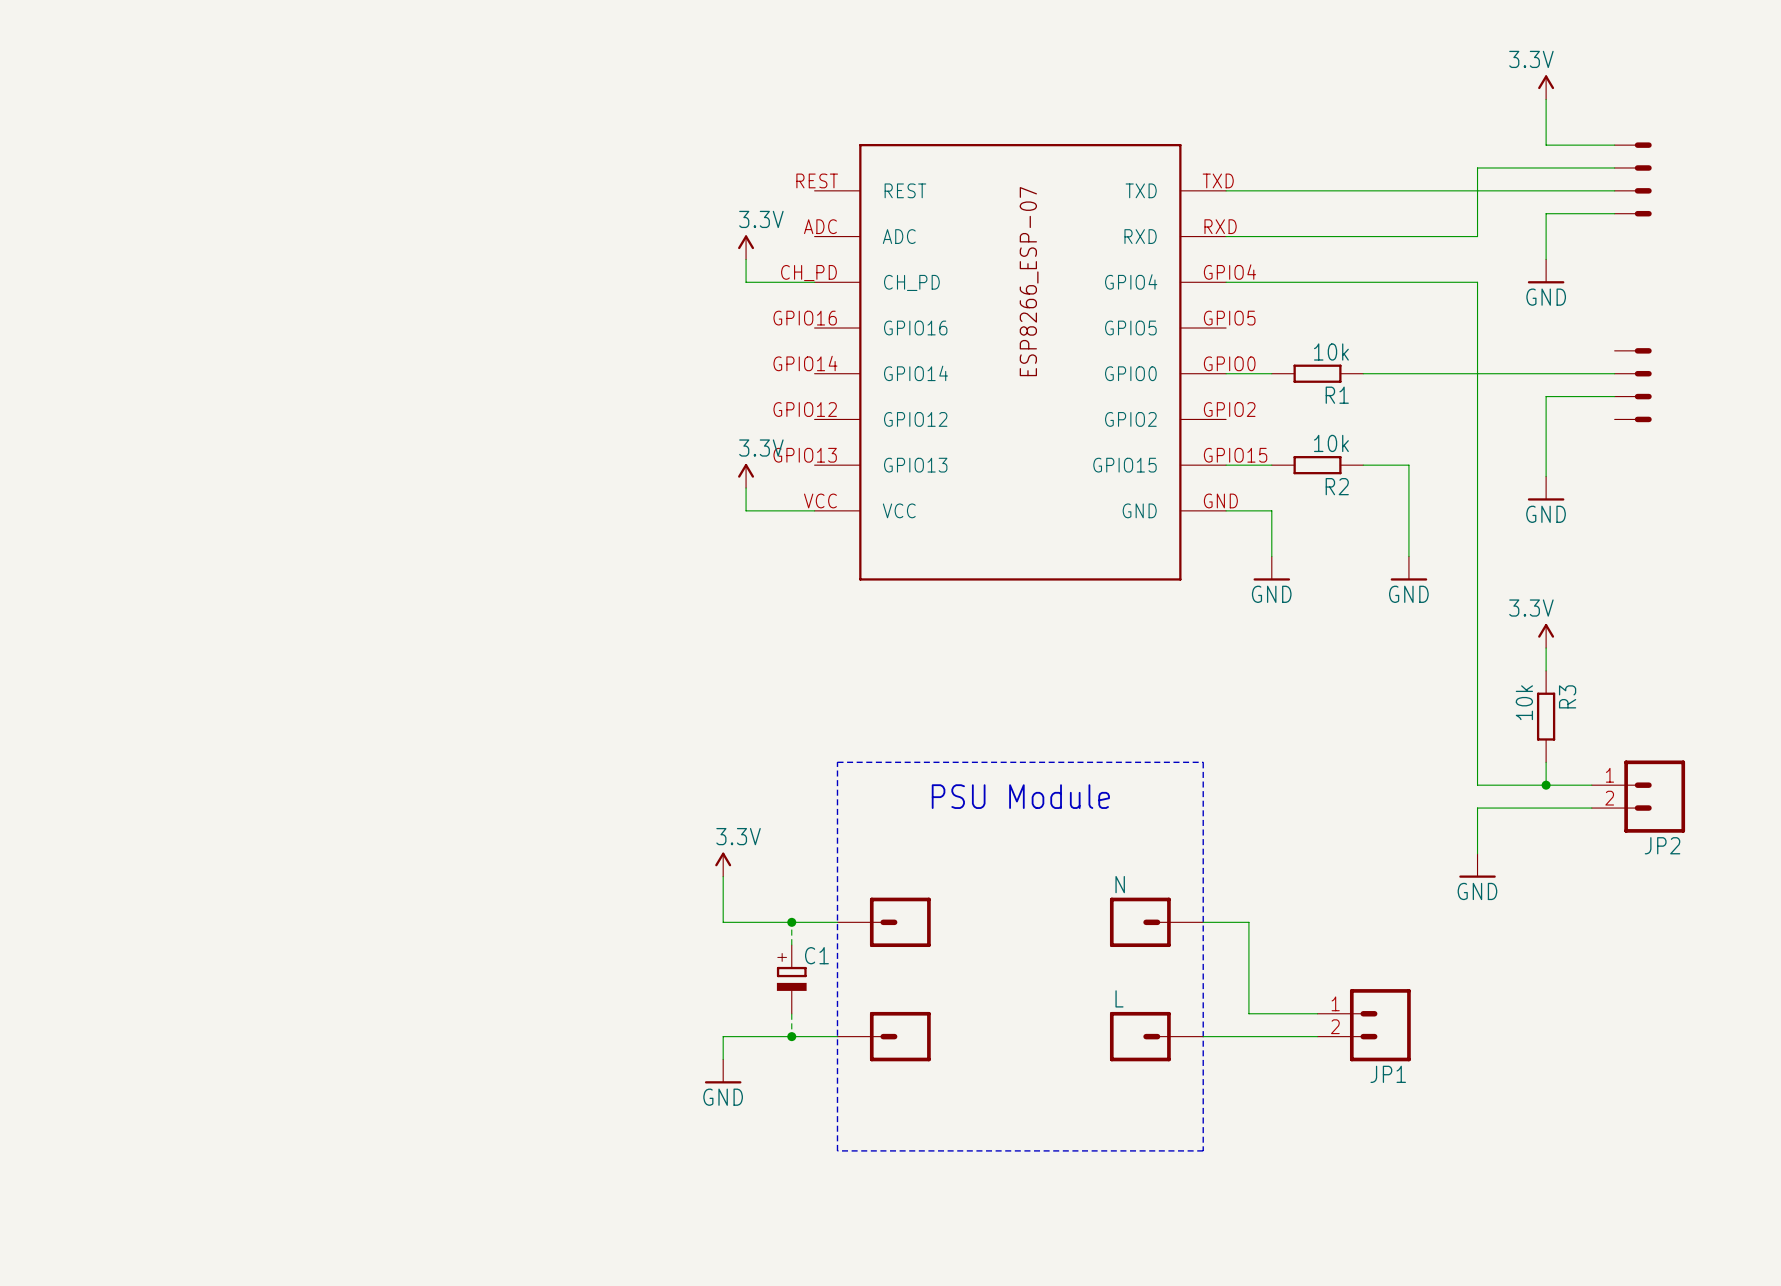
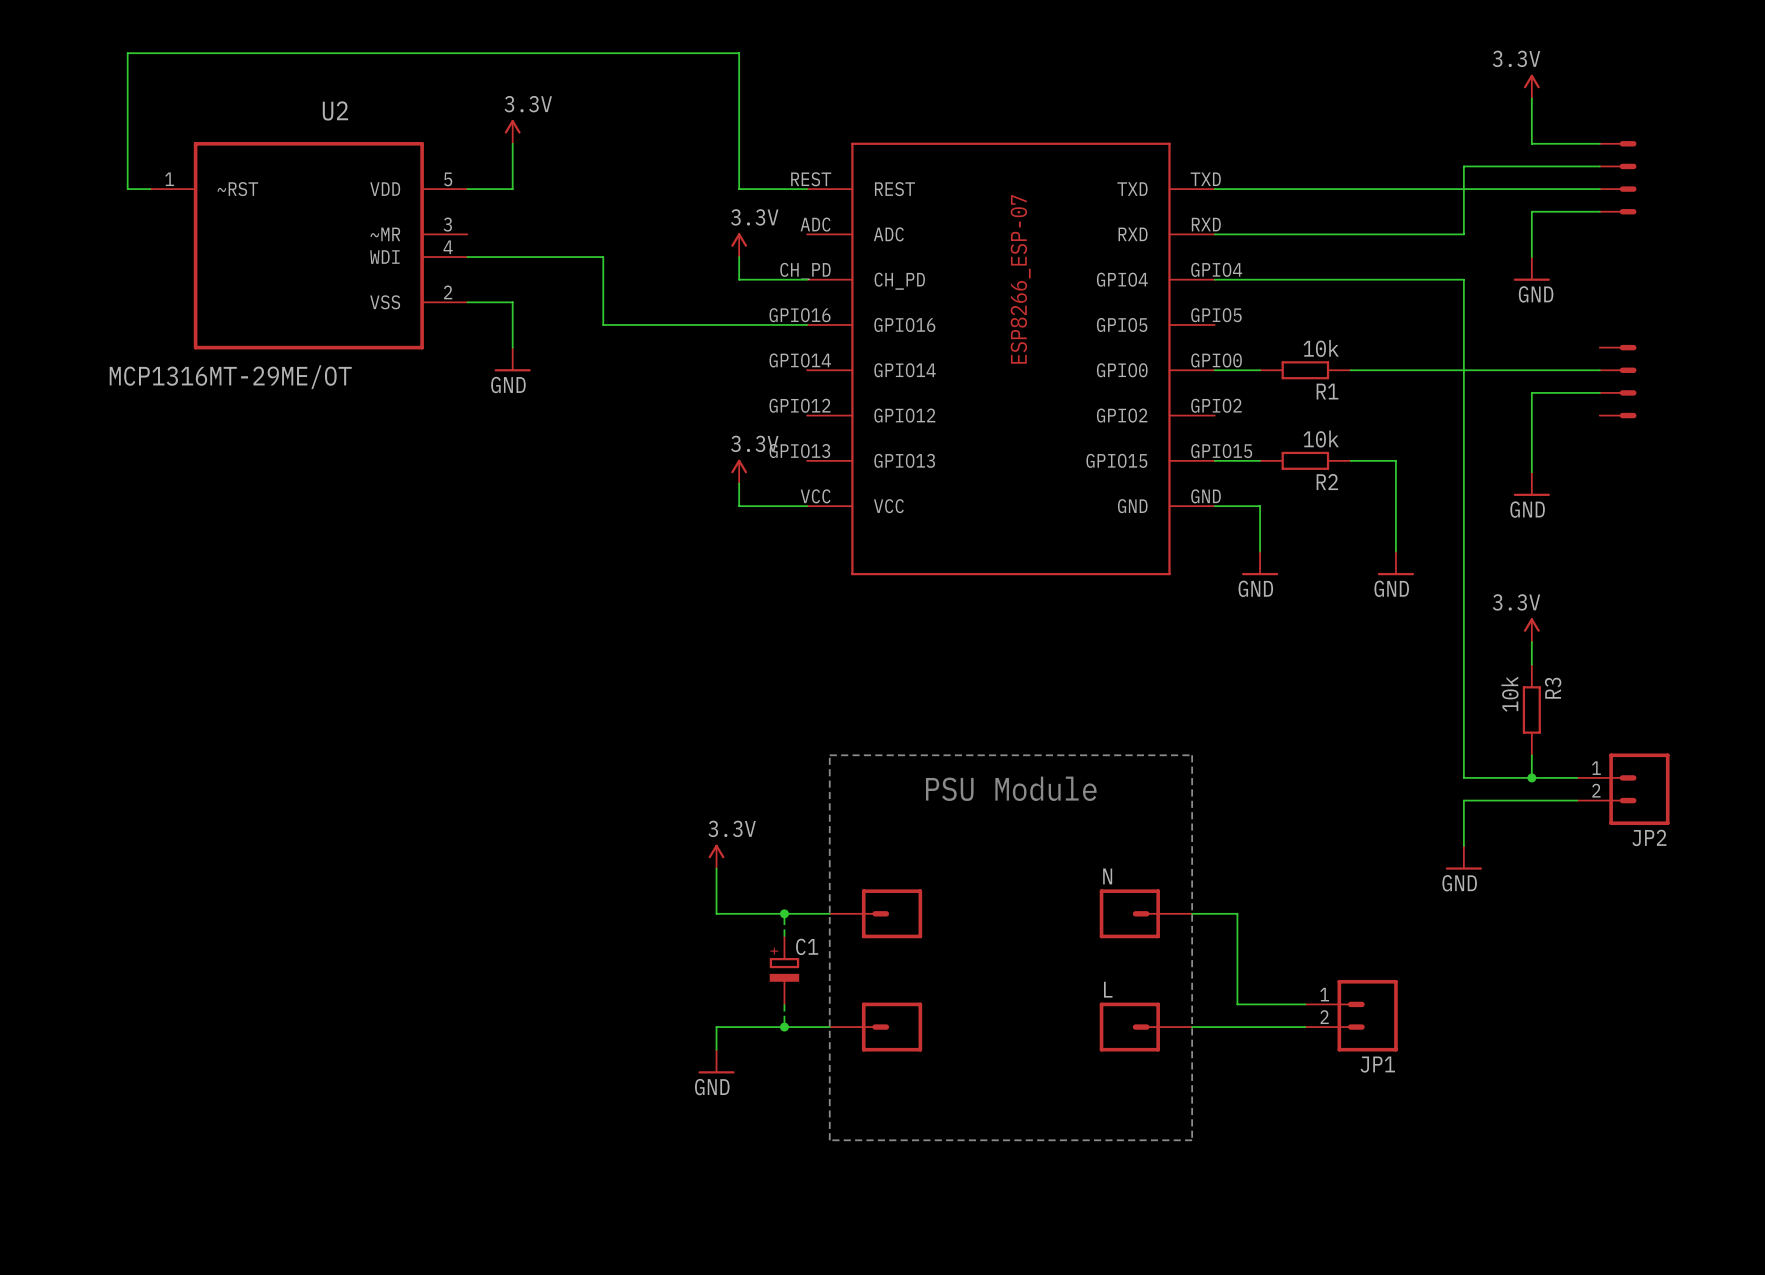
power symbol: none -> 3.3V (512, 131)
wire: none -> (512, 143) (512, 189) (467, 189)
wire: none -> (150, 189) (127, 189) (127, 53) (739, 53) (739, 189) (807, 189)
U2: none -> MCP1316MT-29ME/OT (308, 245)
wire: none -> (467, 257) (603, 257) (603, 324) (807, 324)
wire: none -> (467, 302) (512, 302) (512, 347)
power symbol: none -> GND (512, 359)

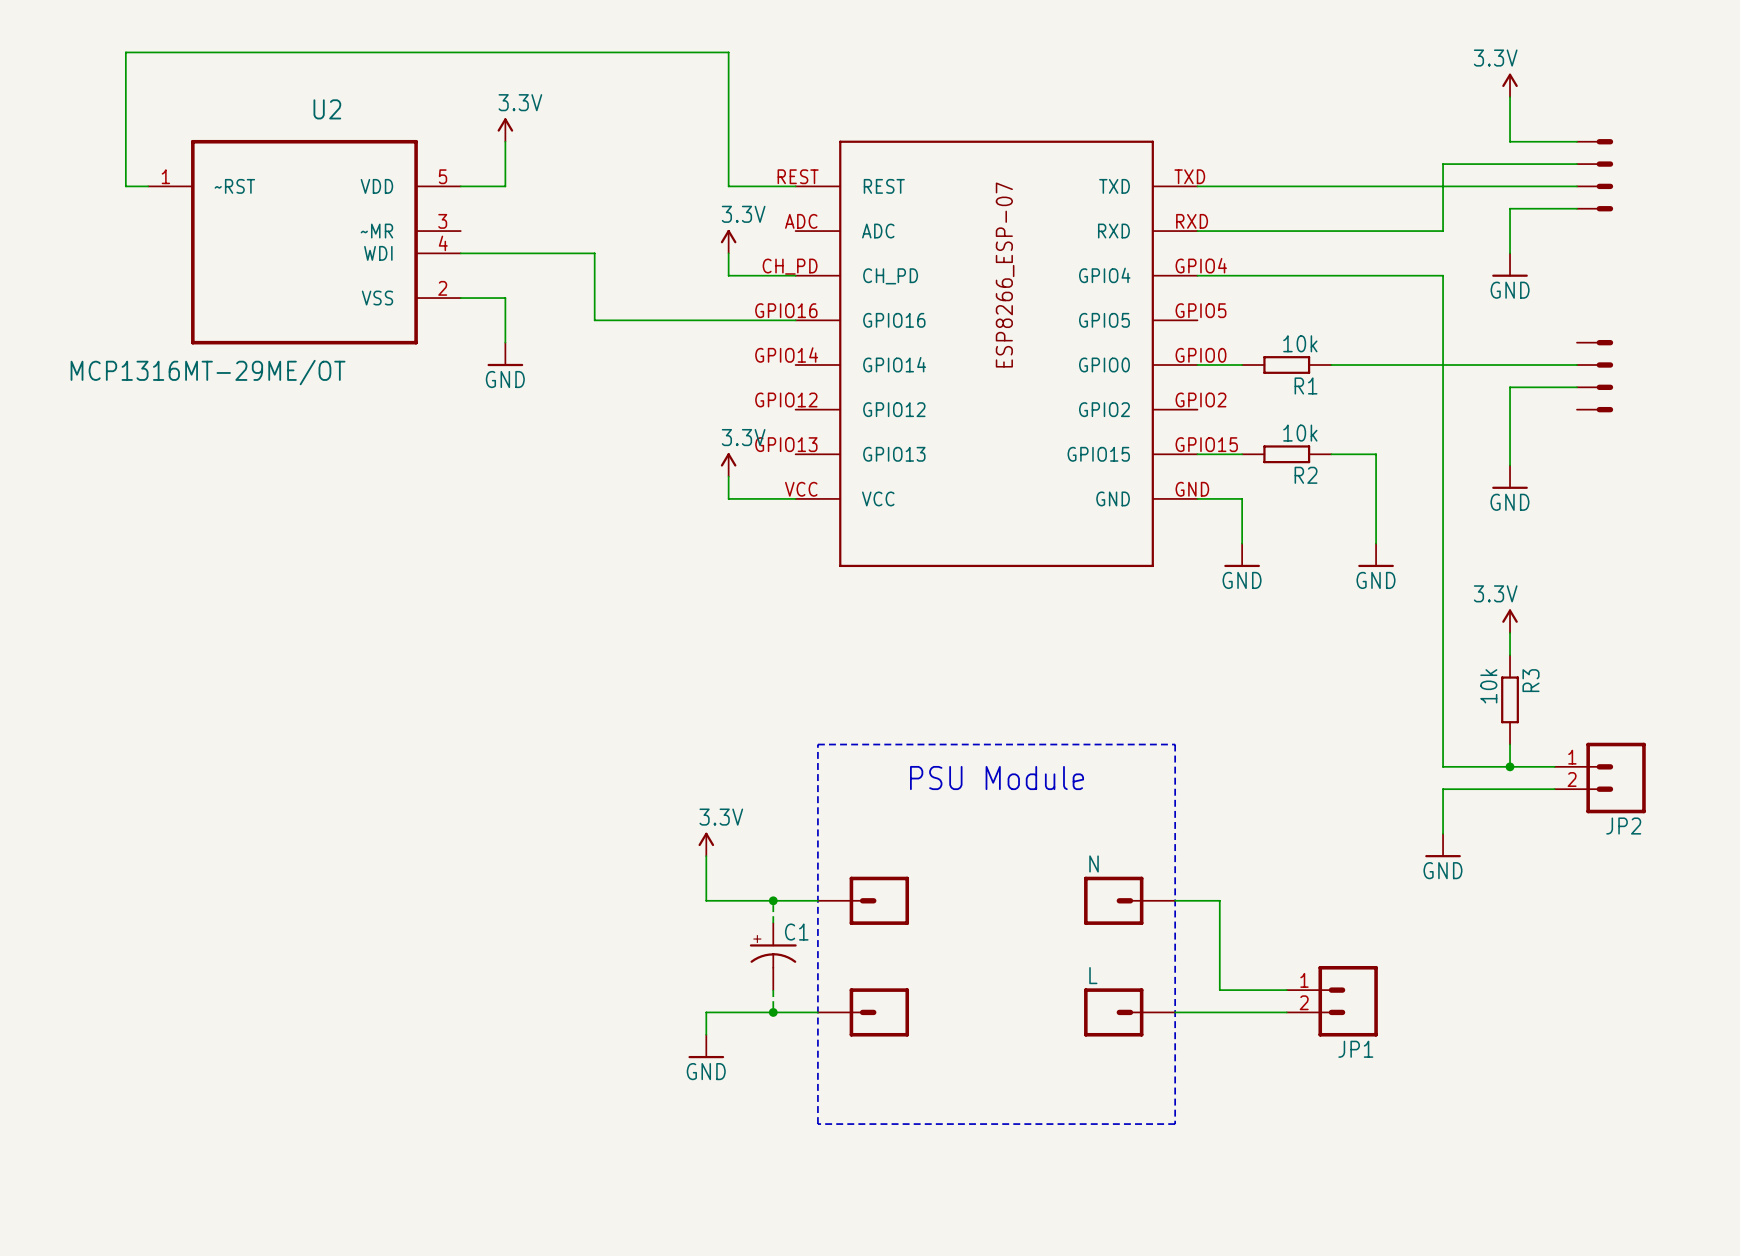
C1 symbol: [769, 936, 800, 1005] -> [749, 923, 797, 991]

